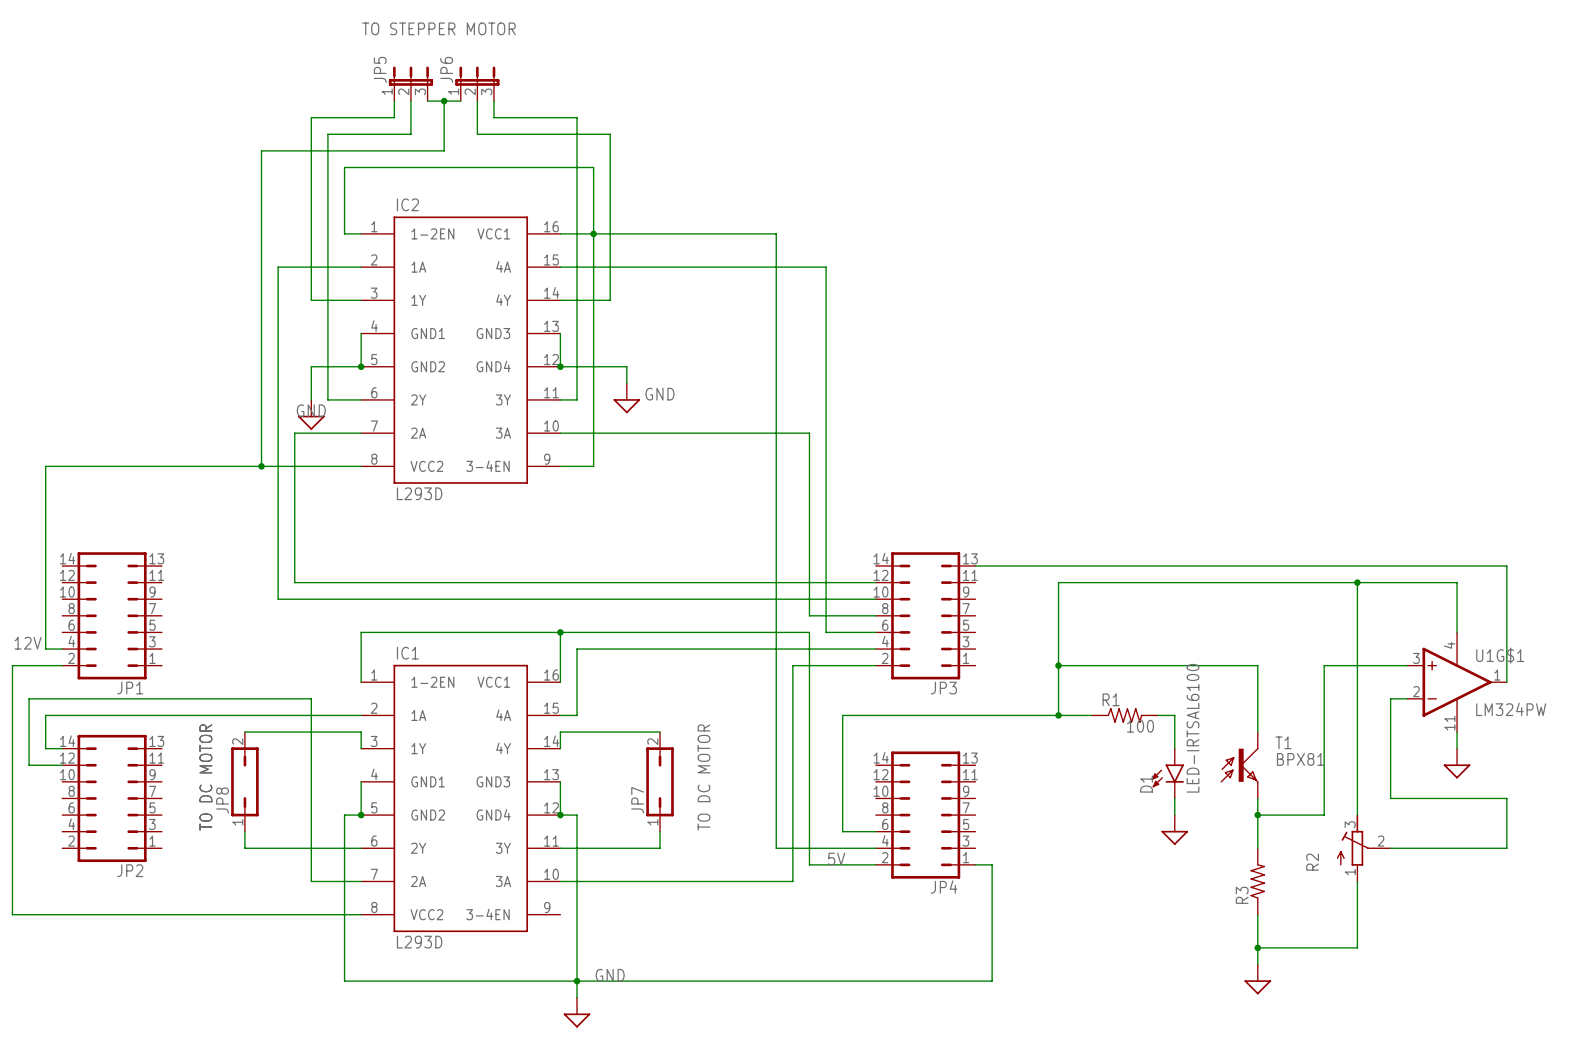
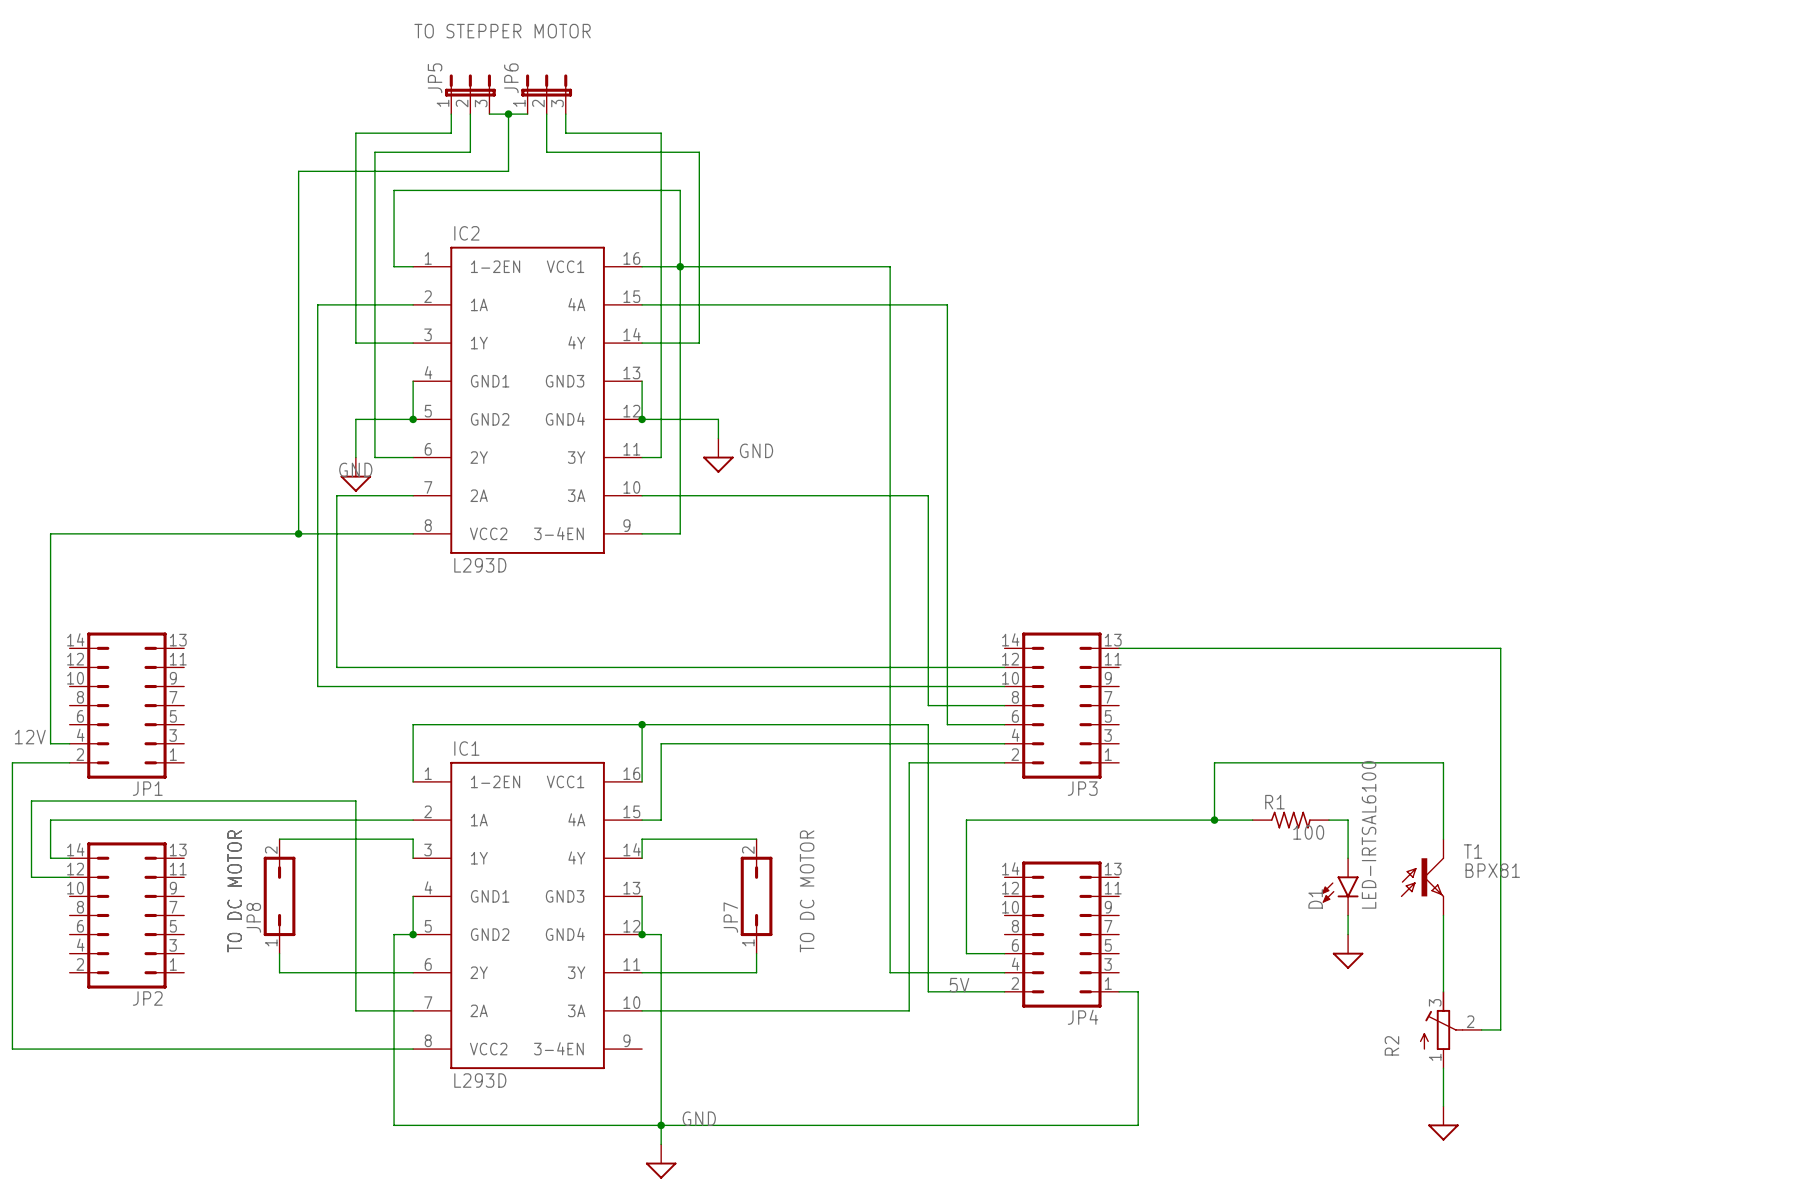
wire: (1307, 566) (1506, 566) (1506, 682) -> (1500, 648) (1500, 1029) (1481, 1029)
wire: (1357, 582) (1357, 815) -> none
junction: (1357, 582) -> none
wire: (1457, 632) (1457, 582) (1058, 582) (1058, 665) -> none
junction: (1058, 665) -> none
wire: (1407, 665) (1324, 665) (1324, 815) (1257, 815) -> none
U1G$1: LM324PW (1457, 682) -> none
wire: (1407, 698) (1390, 698) (1390, 798) (1506, 798) (1506, 848) (1390, 848) -> none
wire: (1457, 732) (1457, 748) -> none
power symbol: (1457, 763) -> none
junction: (1257, 815) -> none
R2 position: (1363, 848) -> (1450, 1029)
R3: (1257, 881) -> none
wire: (1357, 881) (1357, 947) (1257, 947) -> none
junction: (1257, 947) -> none

